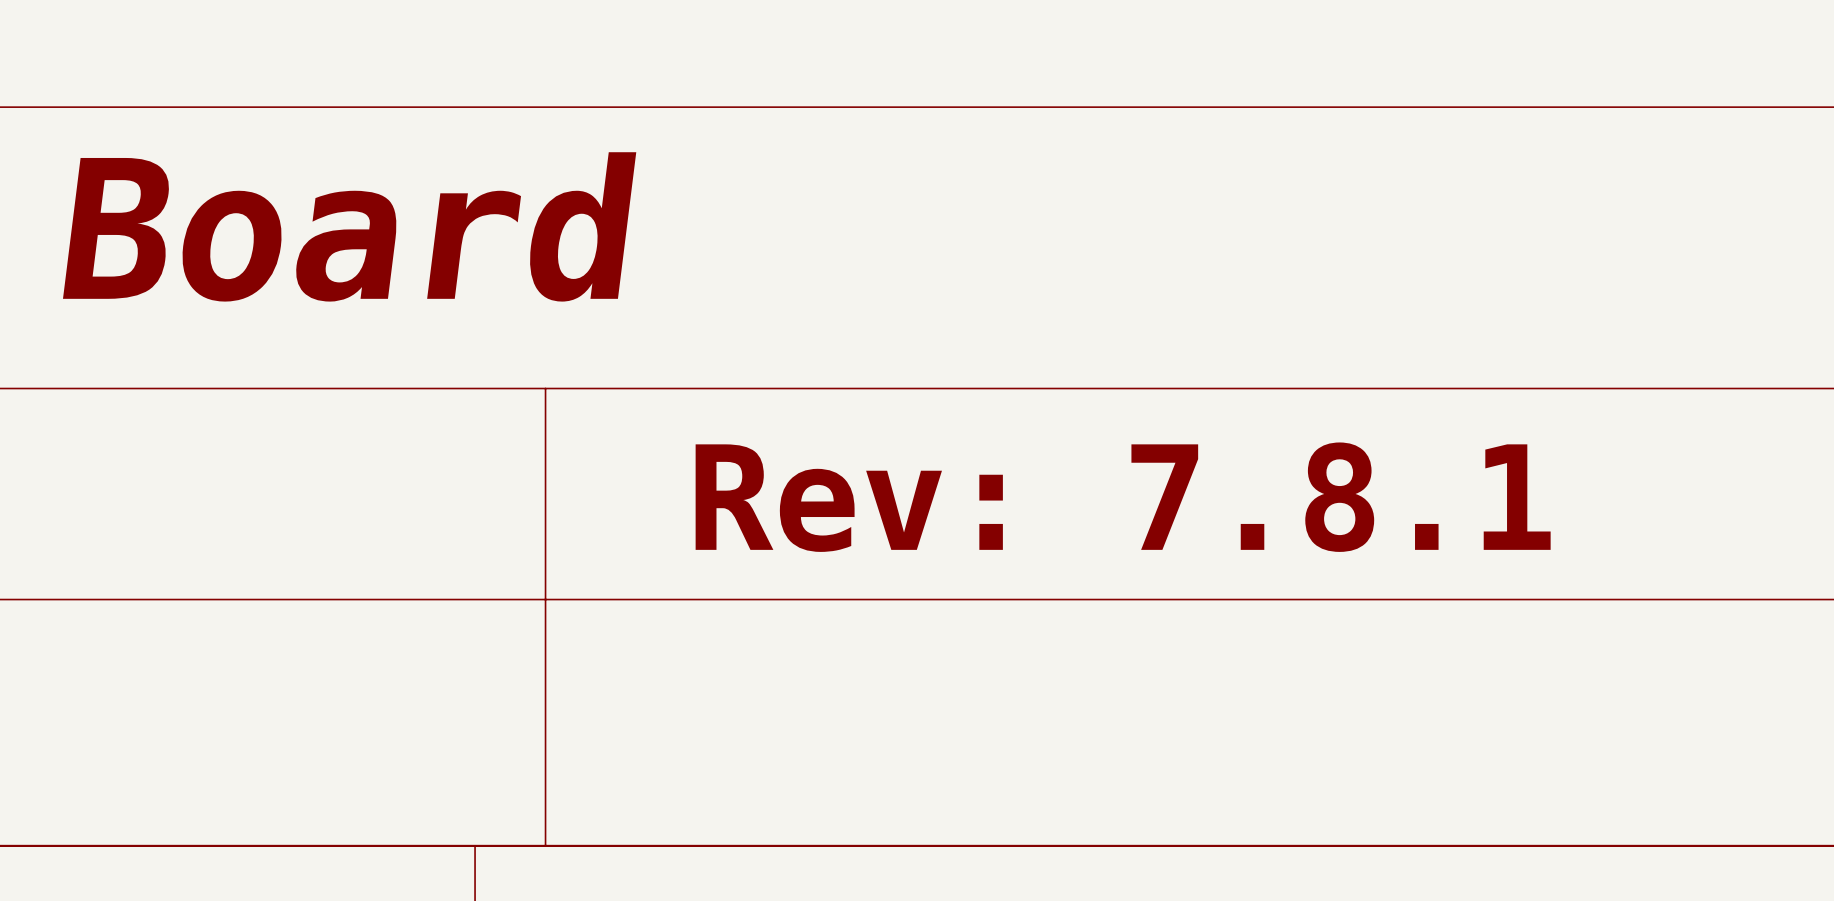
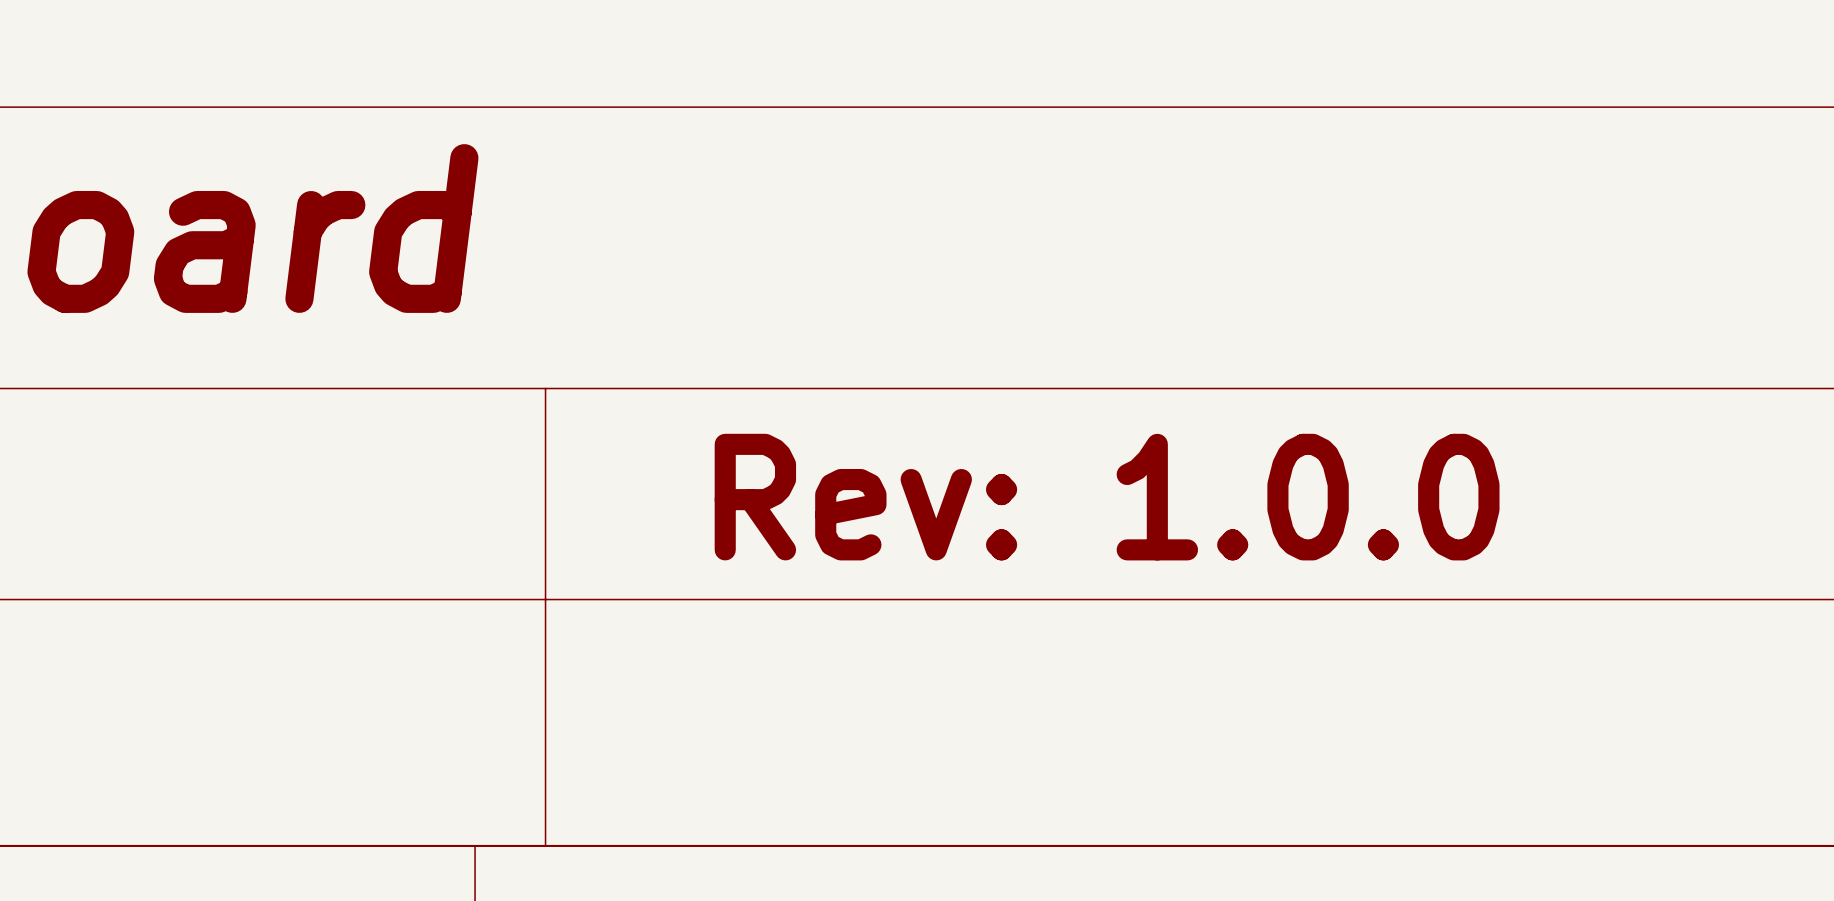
title block: Rev: 7.8.1 (1123, 497) -> Rev: 1.0.0 (1107, 497)

